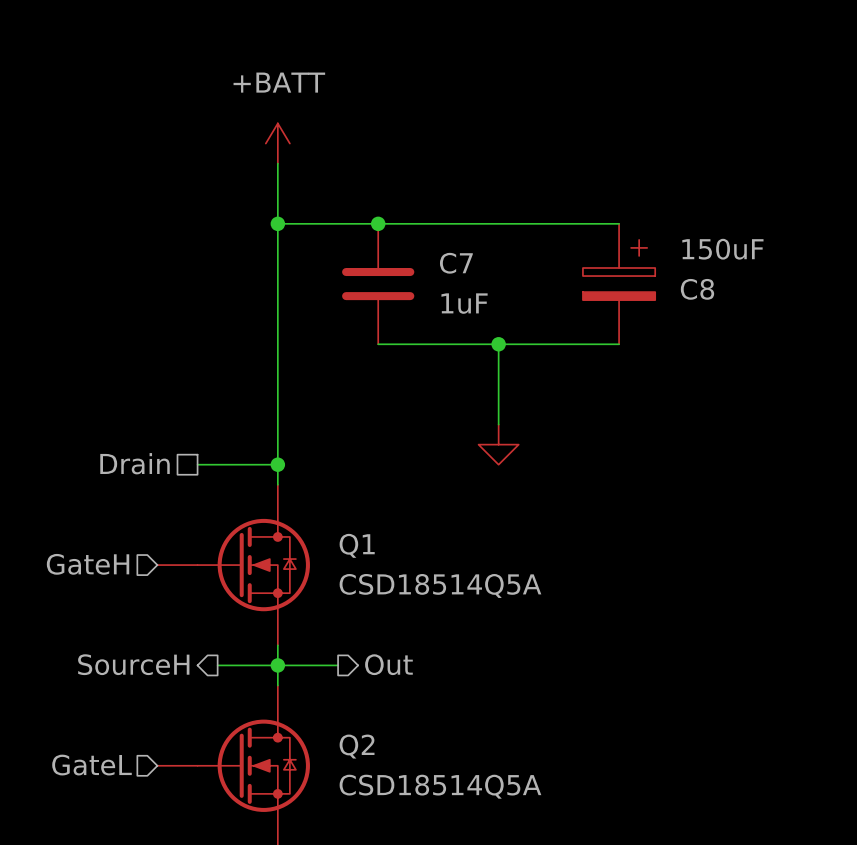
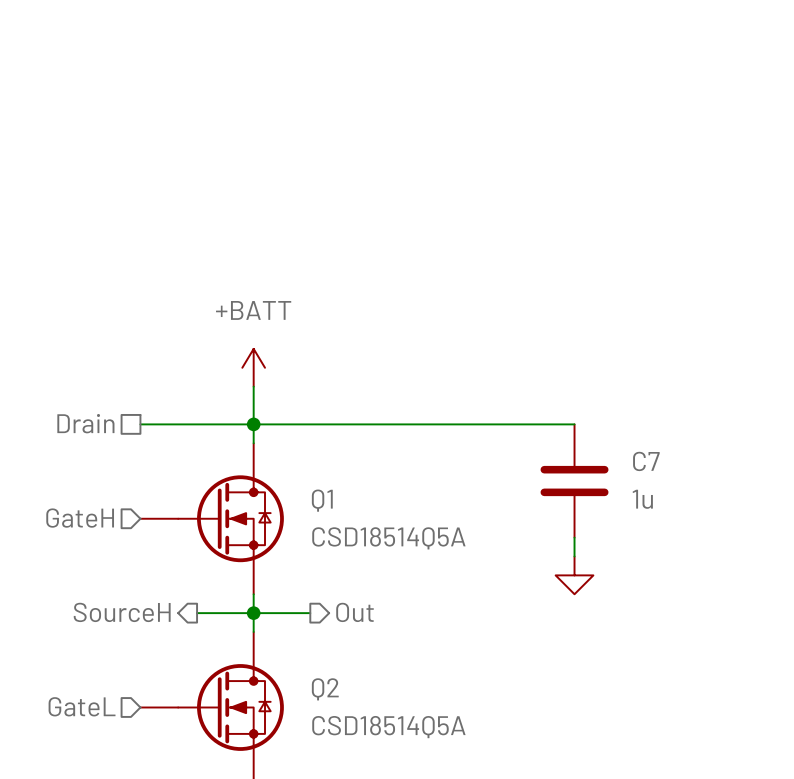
power symbol position: +BATT (277, 143) -> +BATT (253, 367)
wire: (277, 163) (277, 424) -> none
wire: (277, 223) (619, 223) -> (253, 424) (574, 424)
junction: (277, 223) -> none
junction: (378, 223) -> none
C7 position: (378, 284) -> (574, 481)
C8: 150uF (619, 284) -> none
C7 value: 1uF (464, 303) -> 1u (642, 499)
wire: (378, 344) (619, 344) -> none
wire: (498, 344) (498, 424) -> none
junction: (498, 344) -> none
power symbol position: (498, 444) -> (574, 575)
hierarchical label position: Drain (135, 463) -> Drain (85, 423)
wire: none -> (140, 424) (178, 424)
wire: none -> (574, 537) (574, 556)

